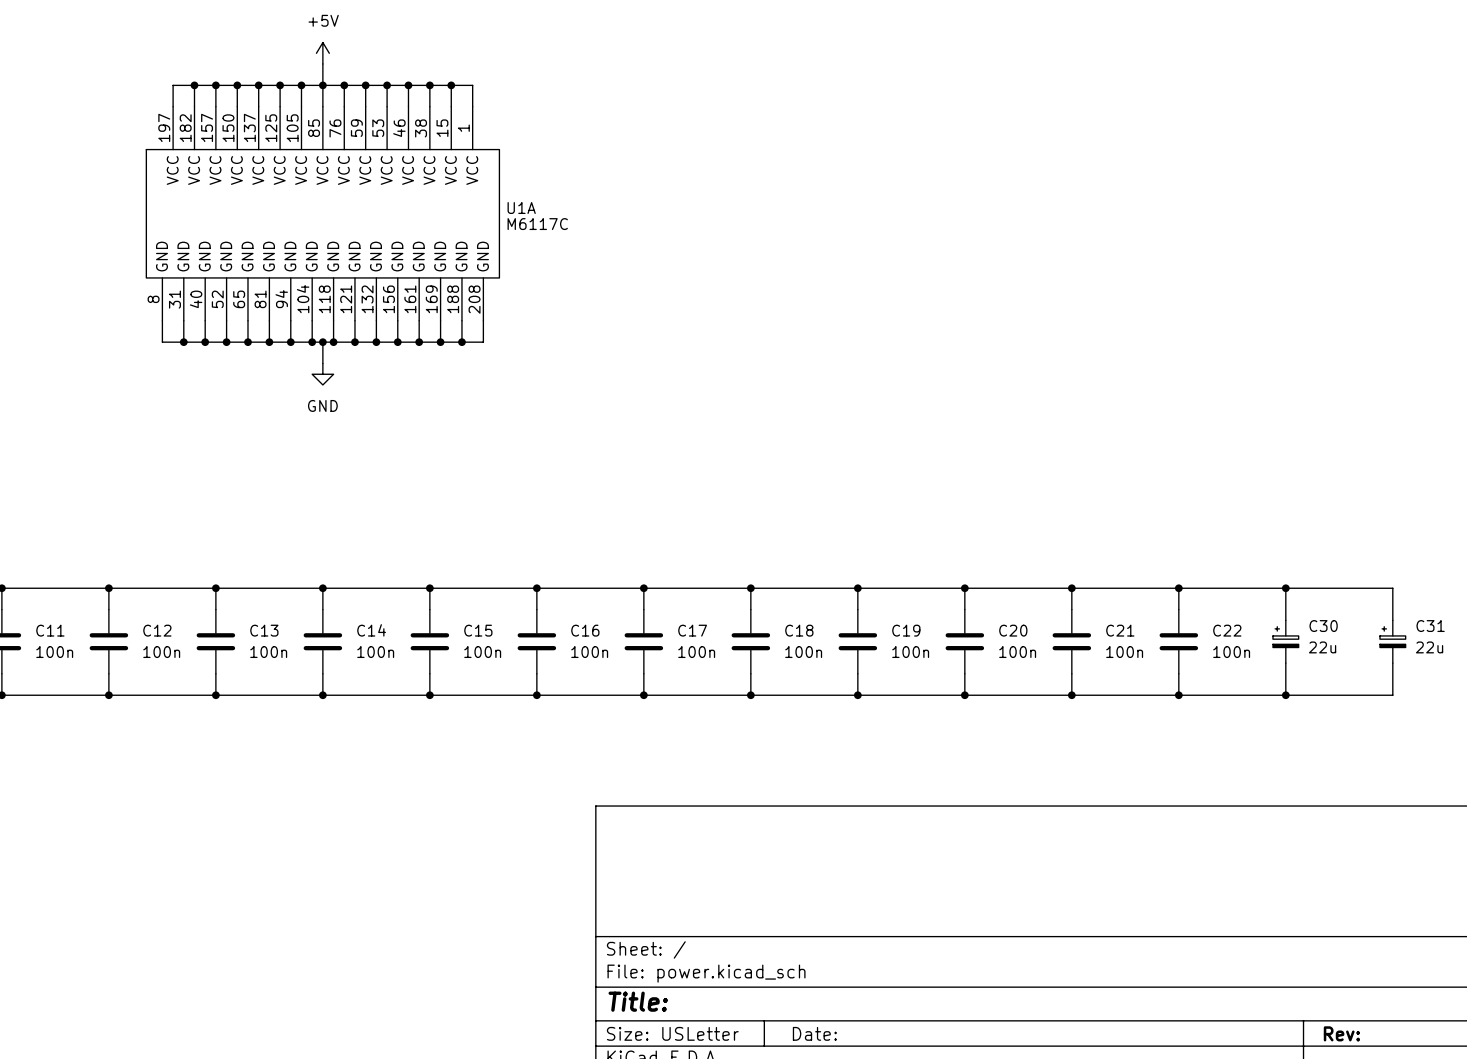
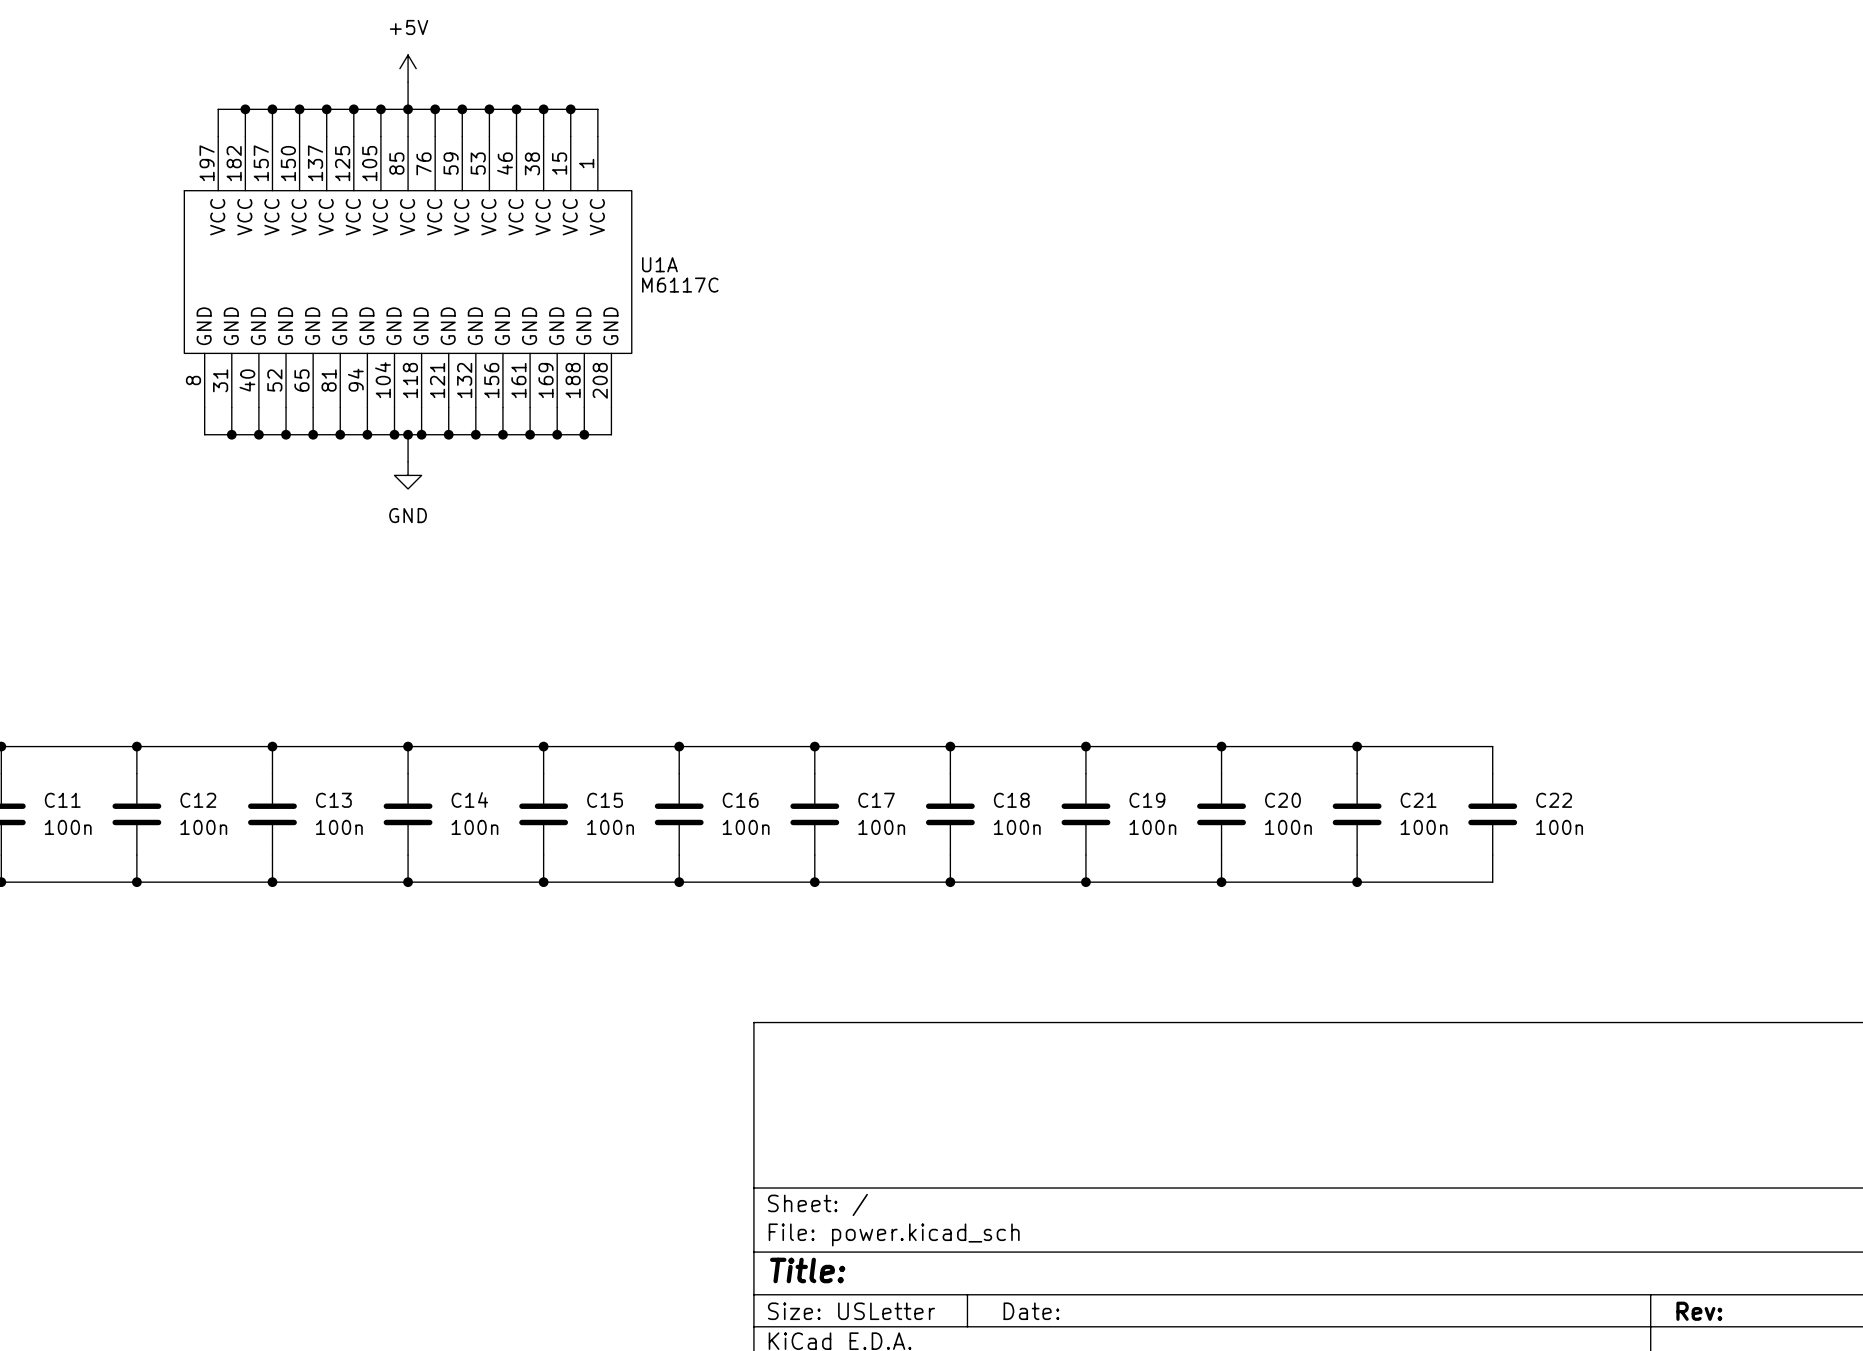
wire: (1178, 588) (1392, 588) (1392, 620) -> none
junction: (1178, 588) -> none
wire: (1285, 588) (1285, 620) -> none
junction: (1285, 588) -> none
C30: 22u (1285, 641) -> none
C31: 22u (1392, 641) -> none
wire: (1285, 663) (1285, 695) -> none
wire: (1392, 663) (1392, 695) (1178, 695) -> none
junction: (1178, 695) -> none
junction: (1285, 695) -> none

